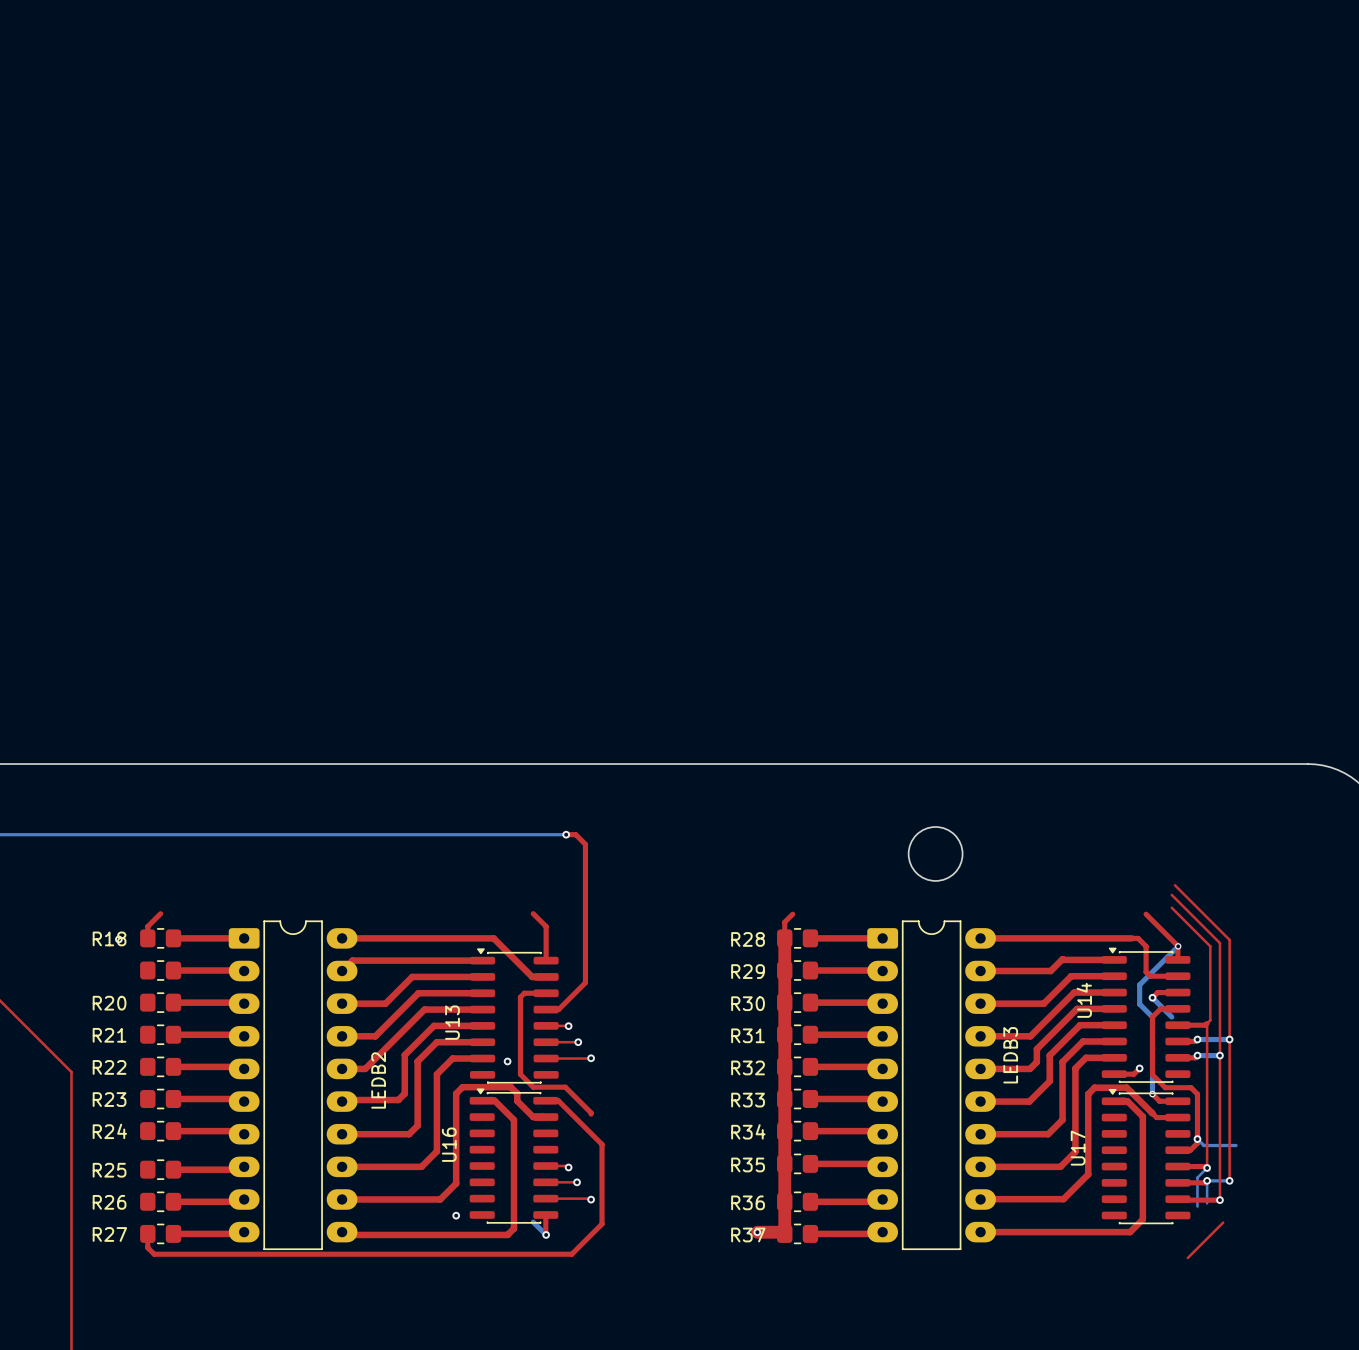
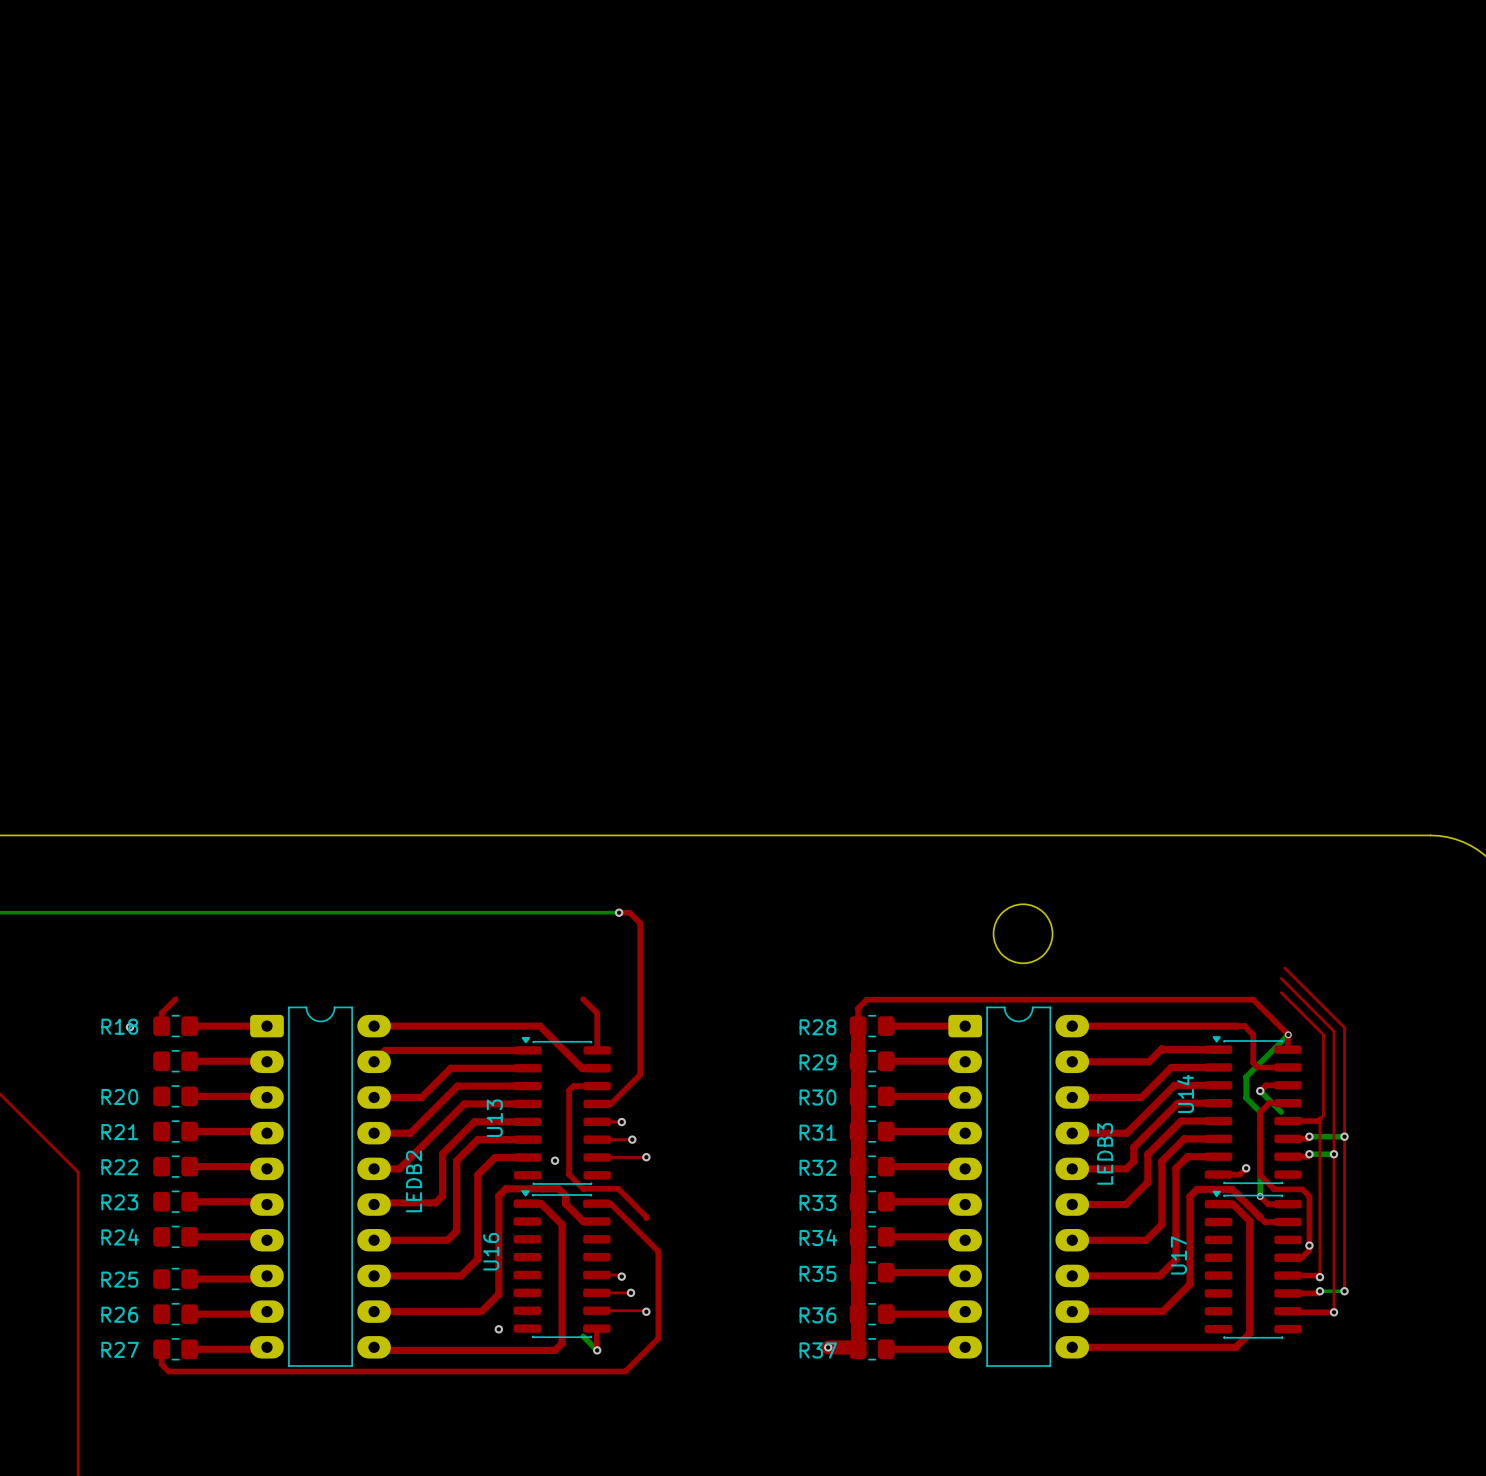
top track: none -> (866, 999) (1253, 999)
bottom track: (1197, 1139) (1203, 1145) (1236, 1145) -> none
bottom track: (1207, 1168) (1197, 1177) (1197, 1206) -> none
bottom track: (1207, 1180) (1207, 1203) -> none
top track: (1223, 1222) (1187, 1257) -> none

